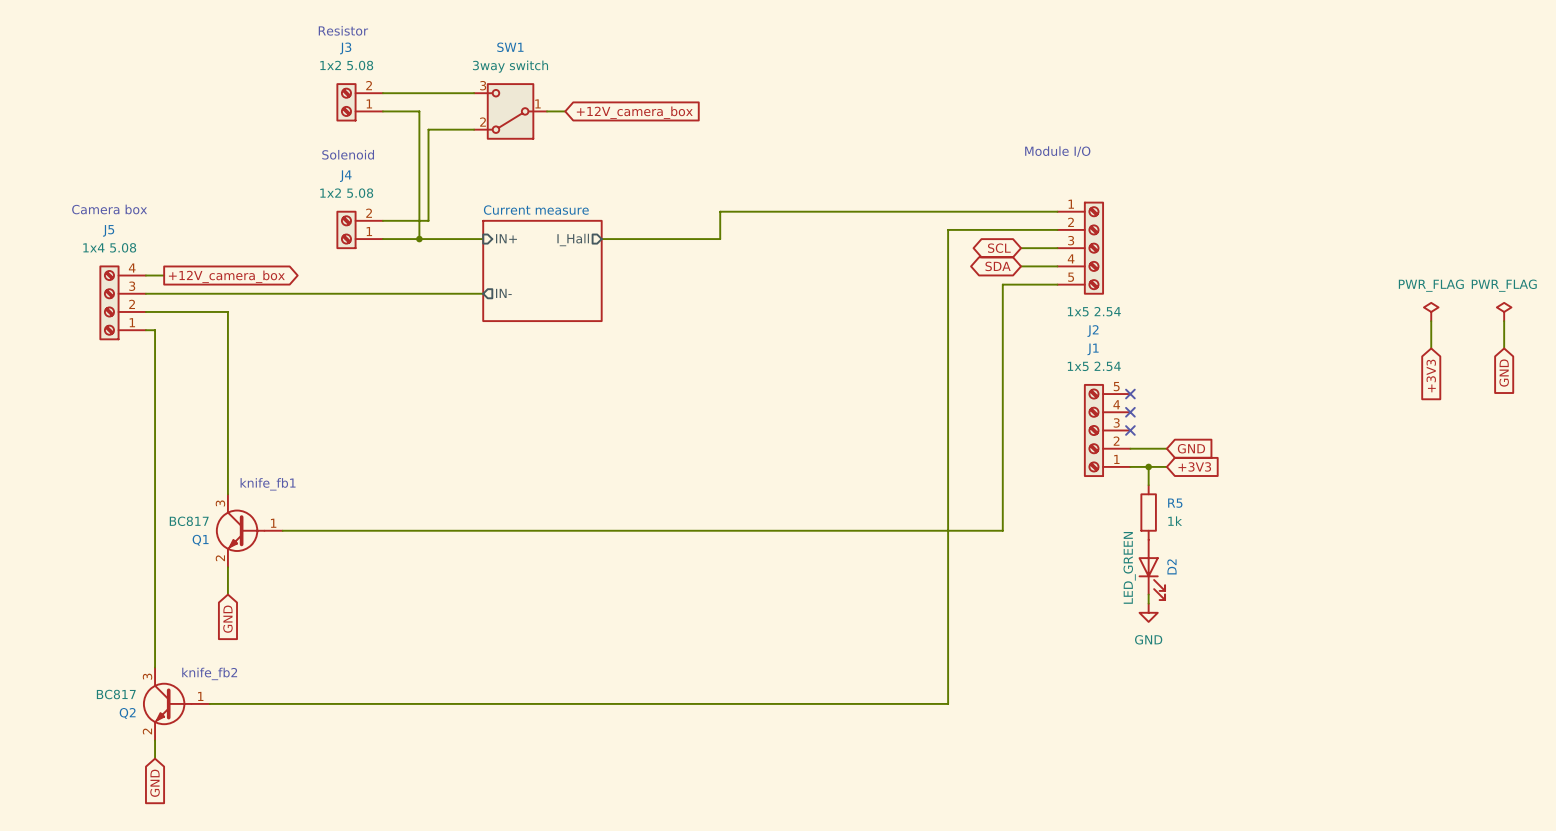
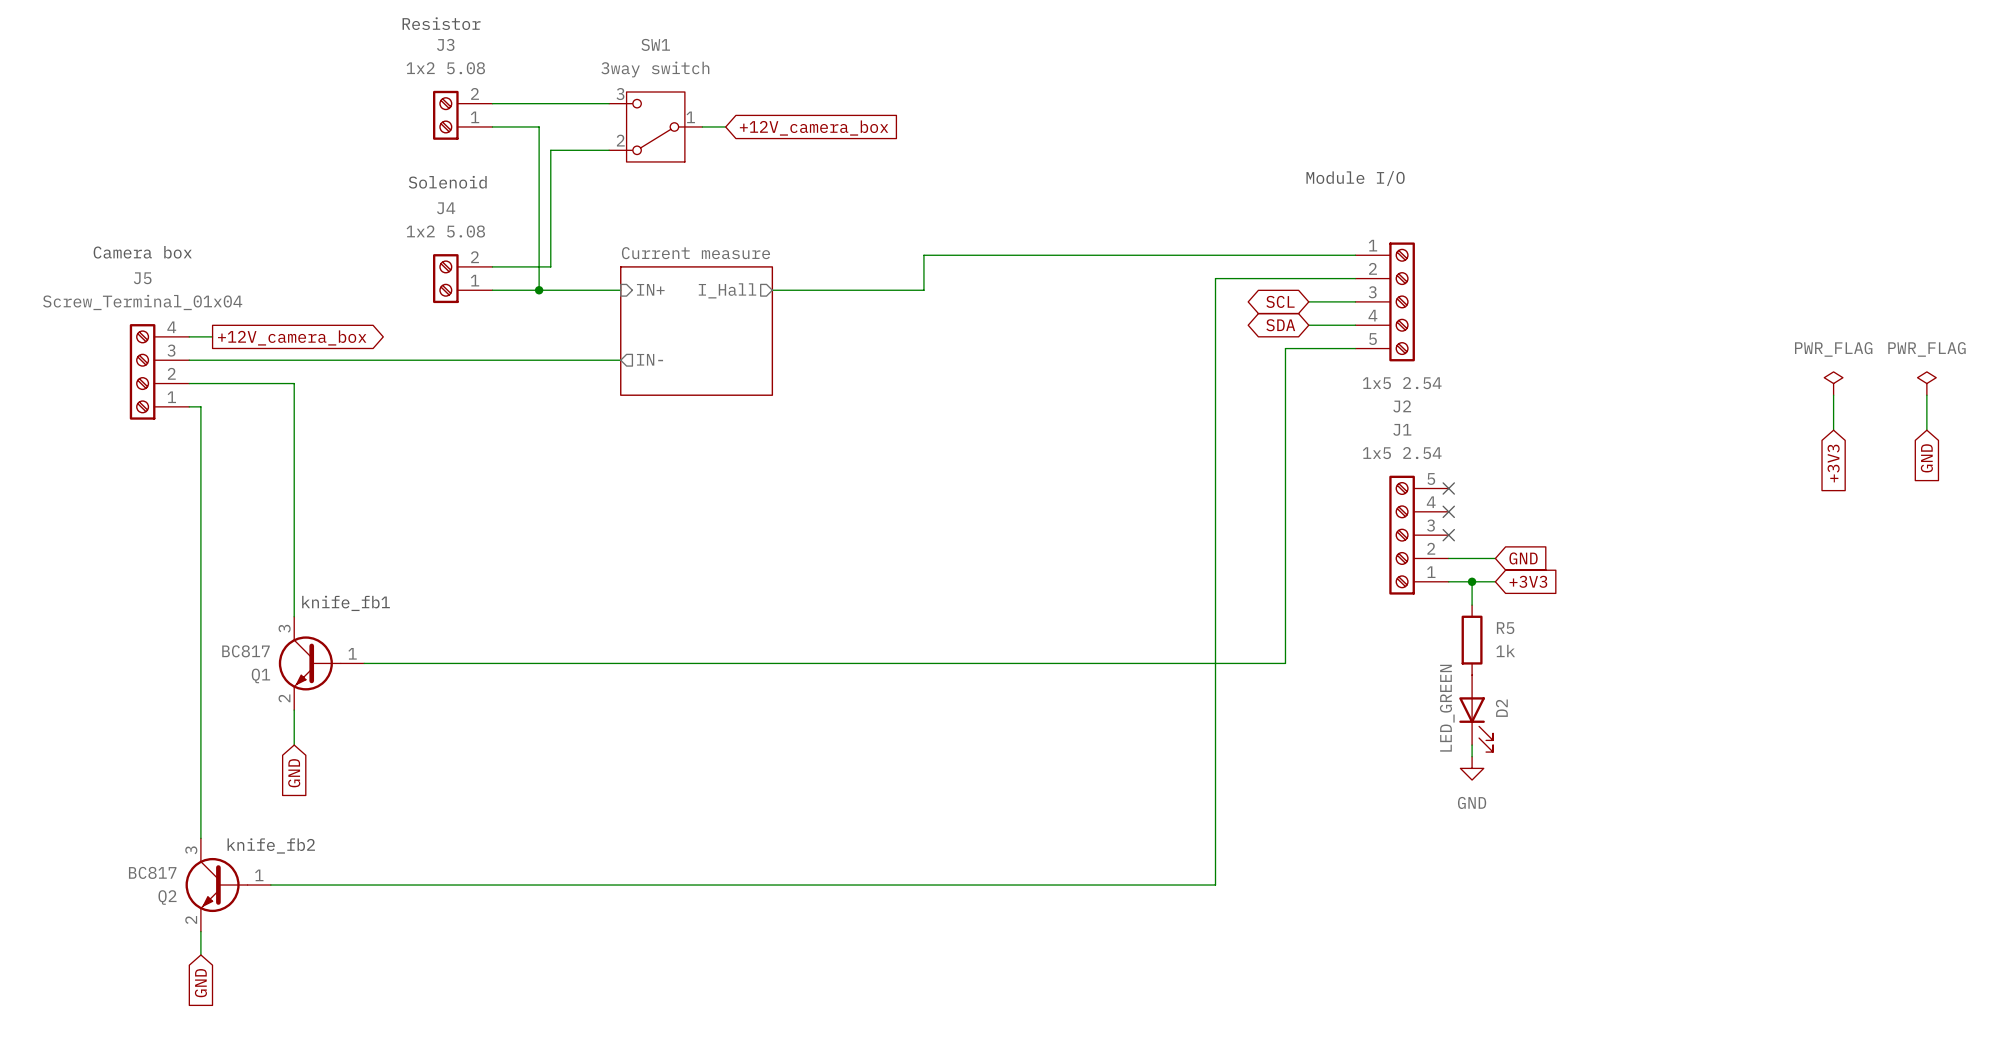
J5 value: 1x4 5.08 (109, 247) -> Screw_Terminal_01x04 (142, 302)

